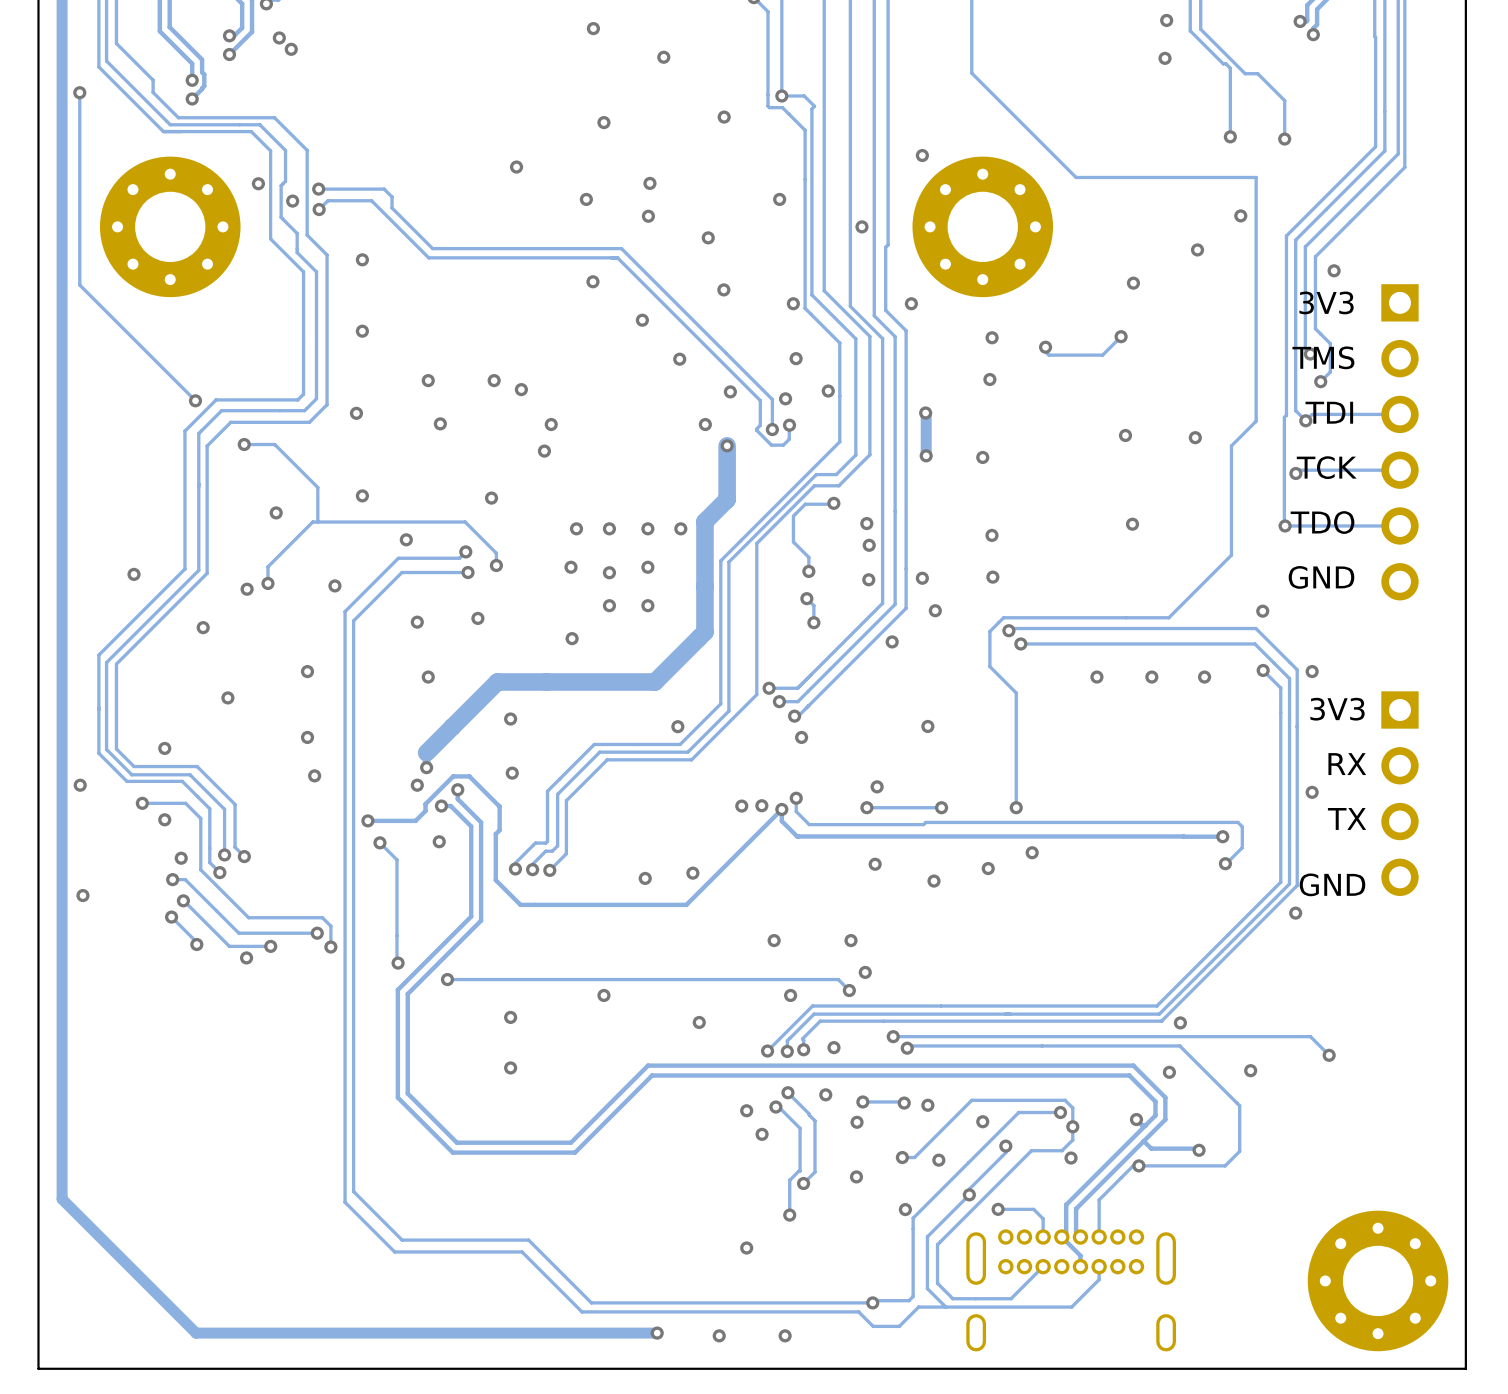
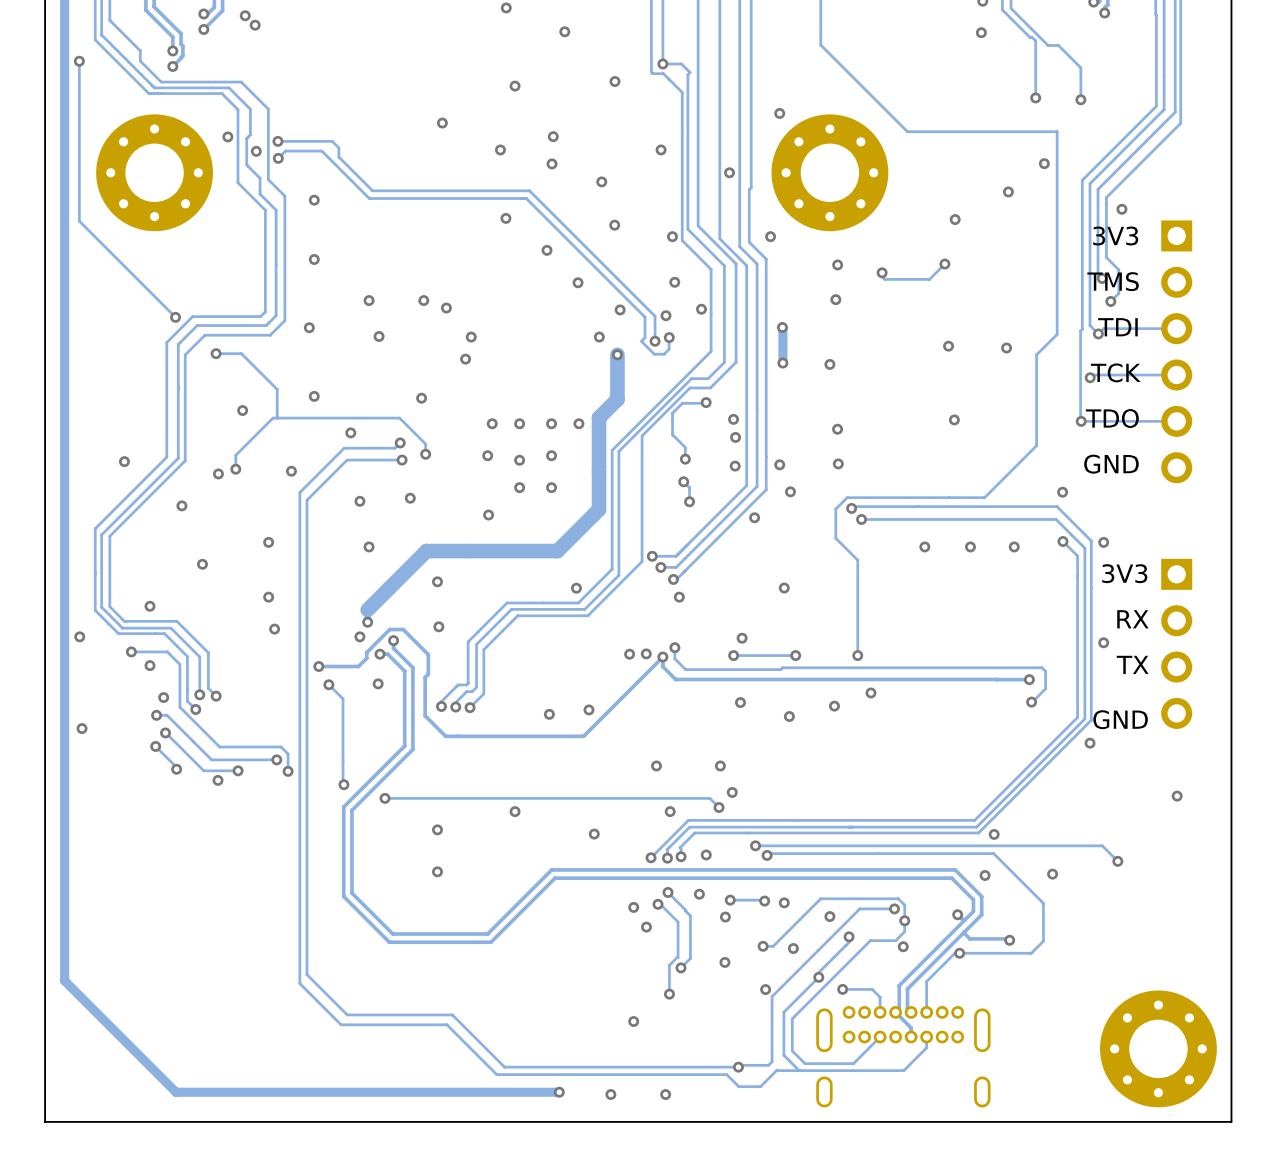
via: none -> (1177, 796)

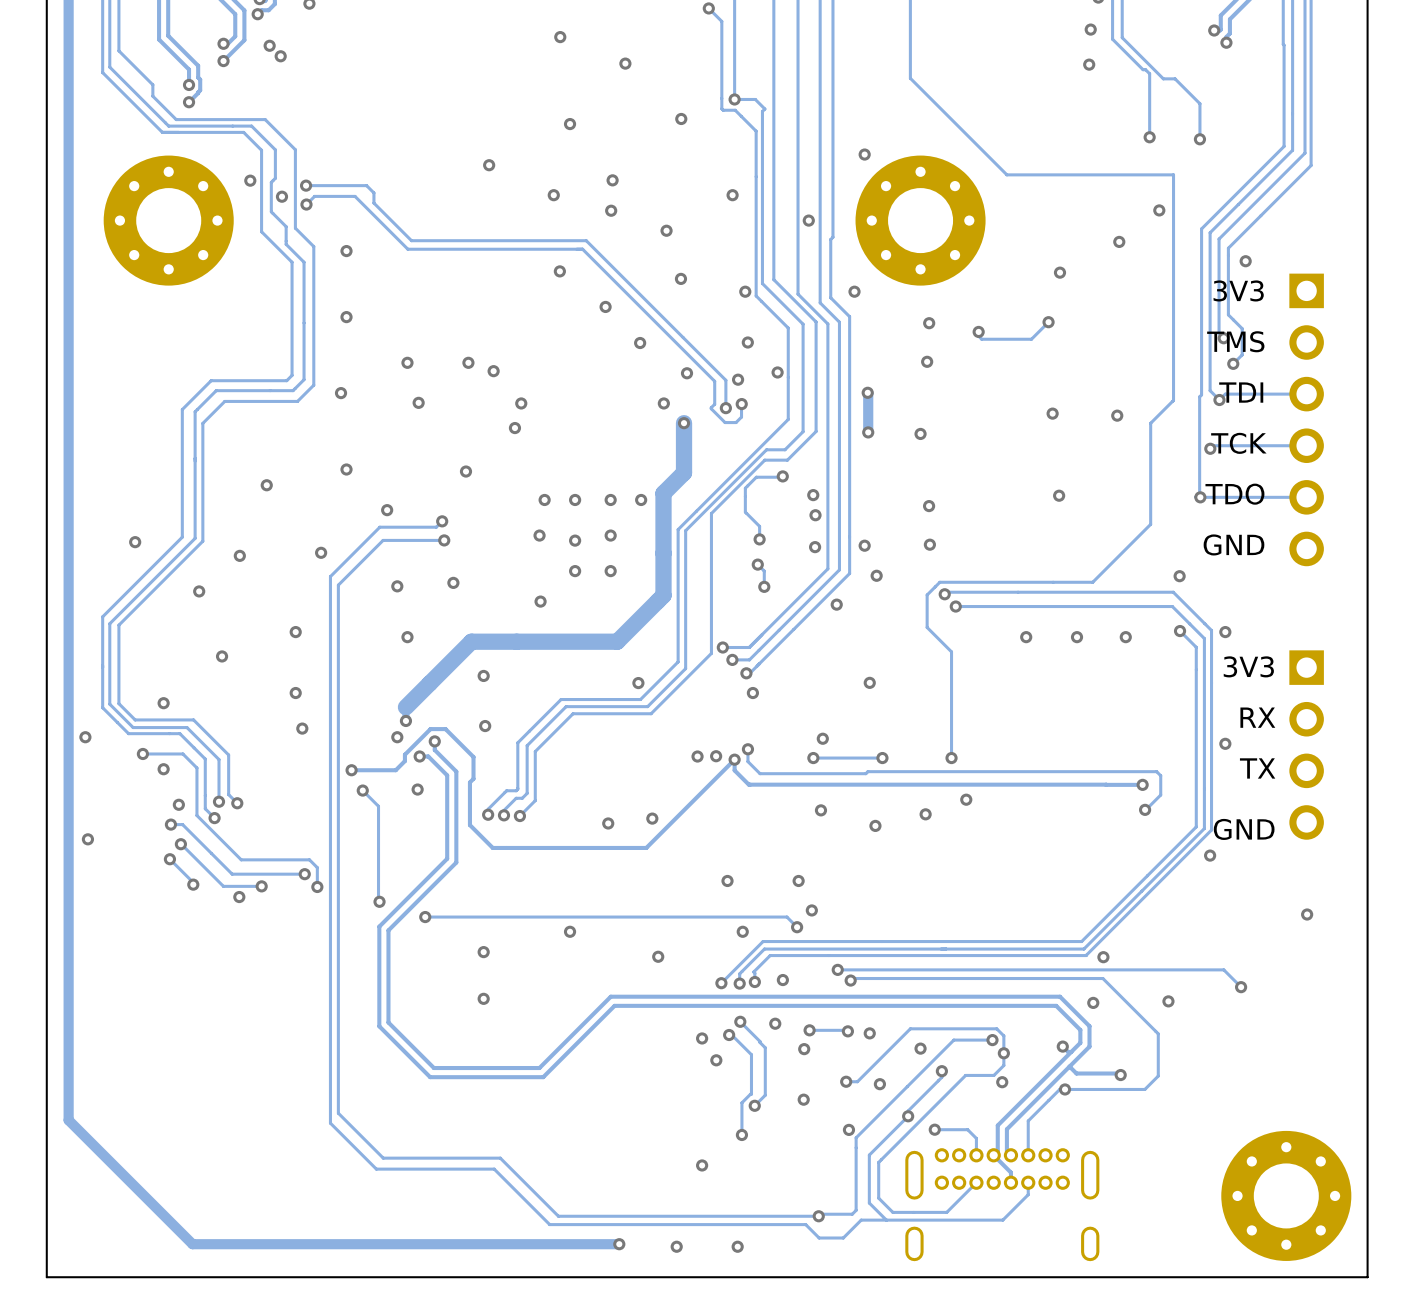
track: (79, 61) (79, 221) (175, 317) -> none
via: (79, 61) -> none
via: (175, 317) -> none
track: (216, 353) (241, 353) (277, 389) (277, 418) -> none
via: (216, 353) -> none
track: (425, 454) (425, 444) (399, 418) (273, 418) (235, 455) (235, 469) -> none
via: (425, 454) -> none
via: (235, 469) -> none

